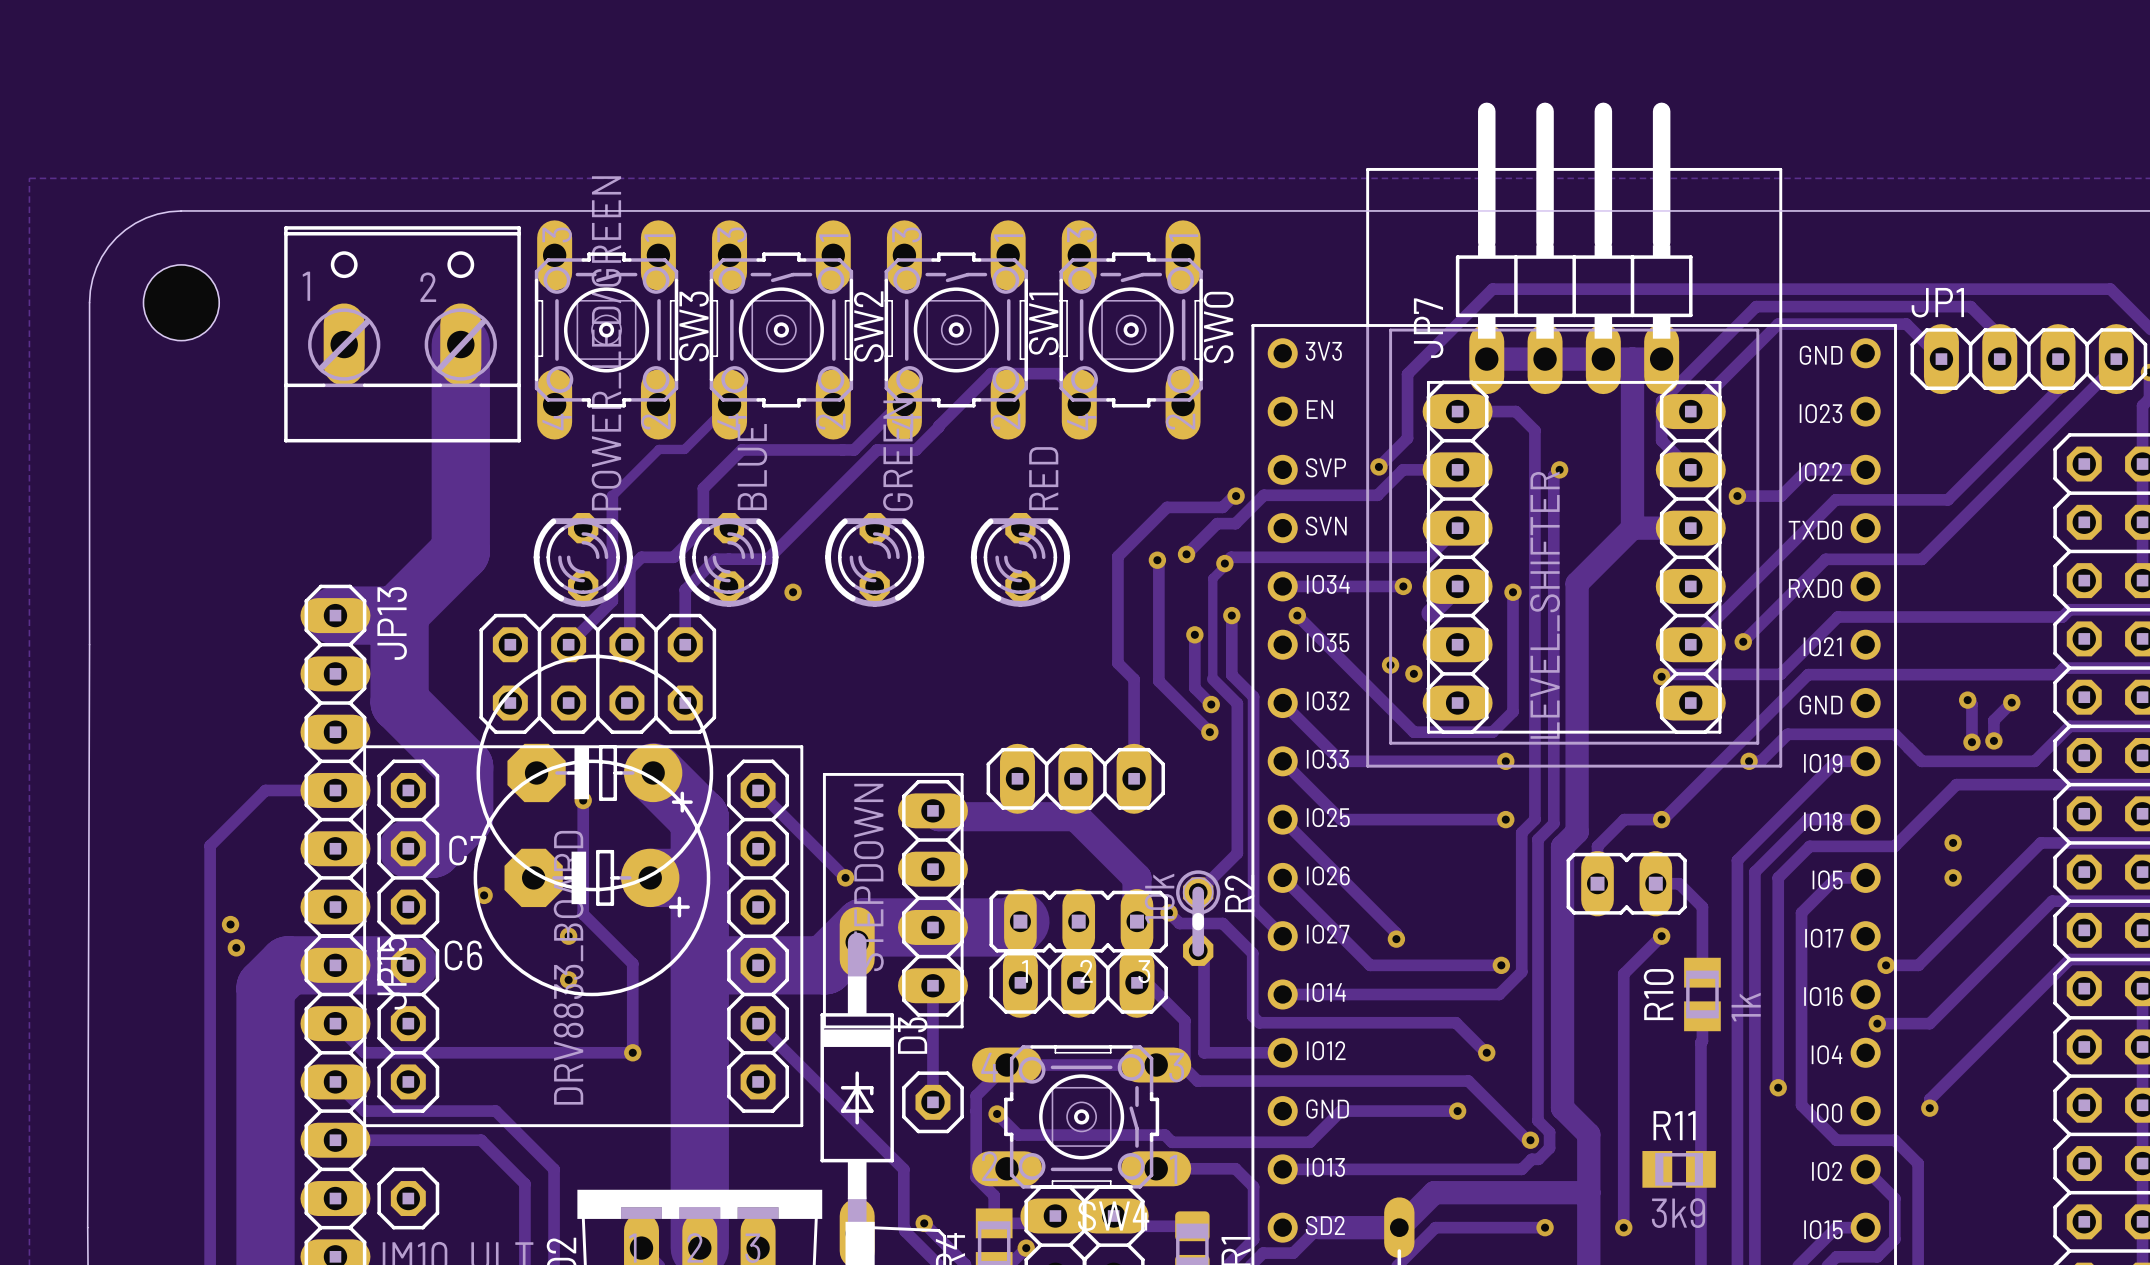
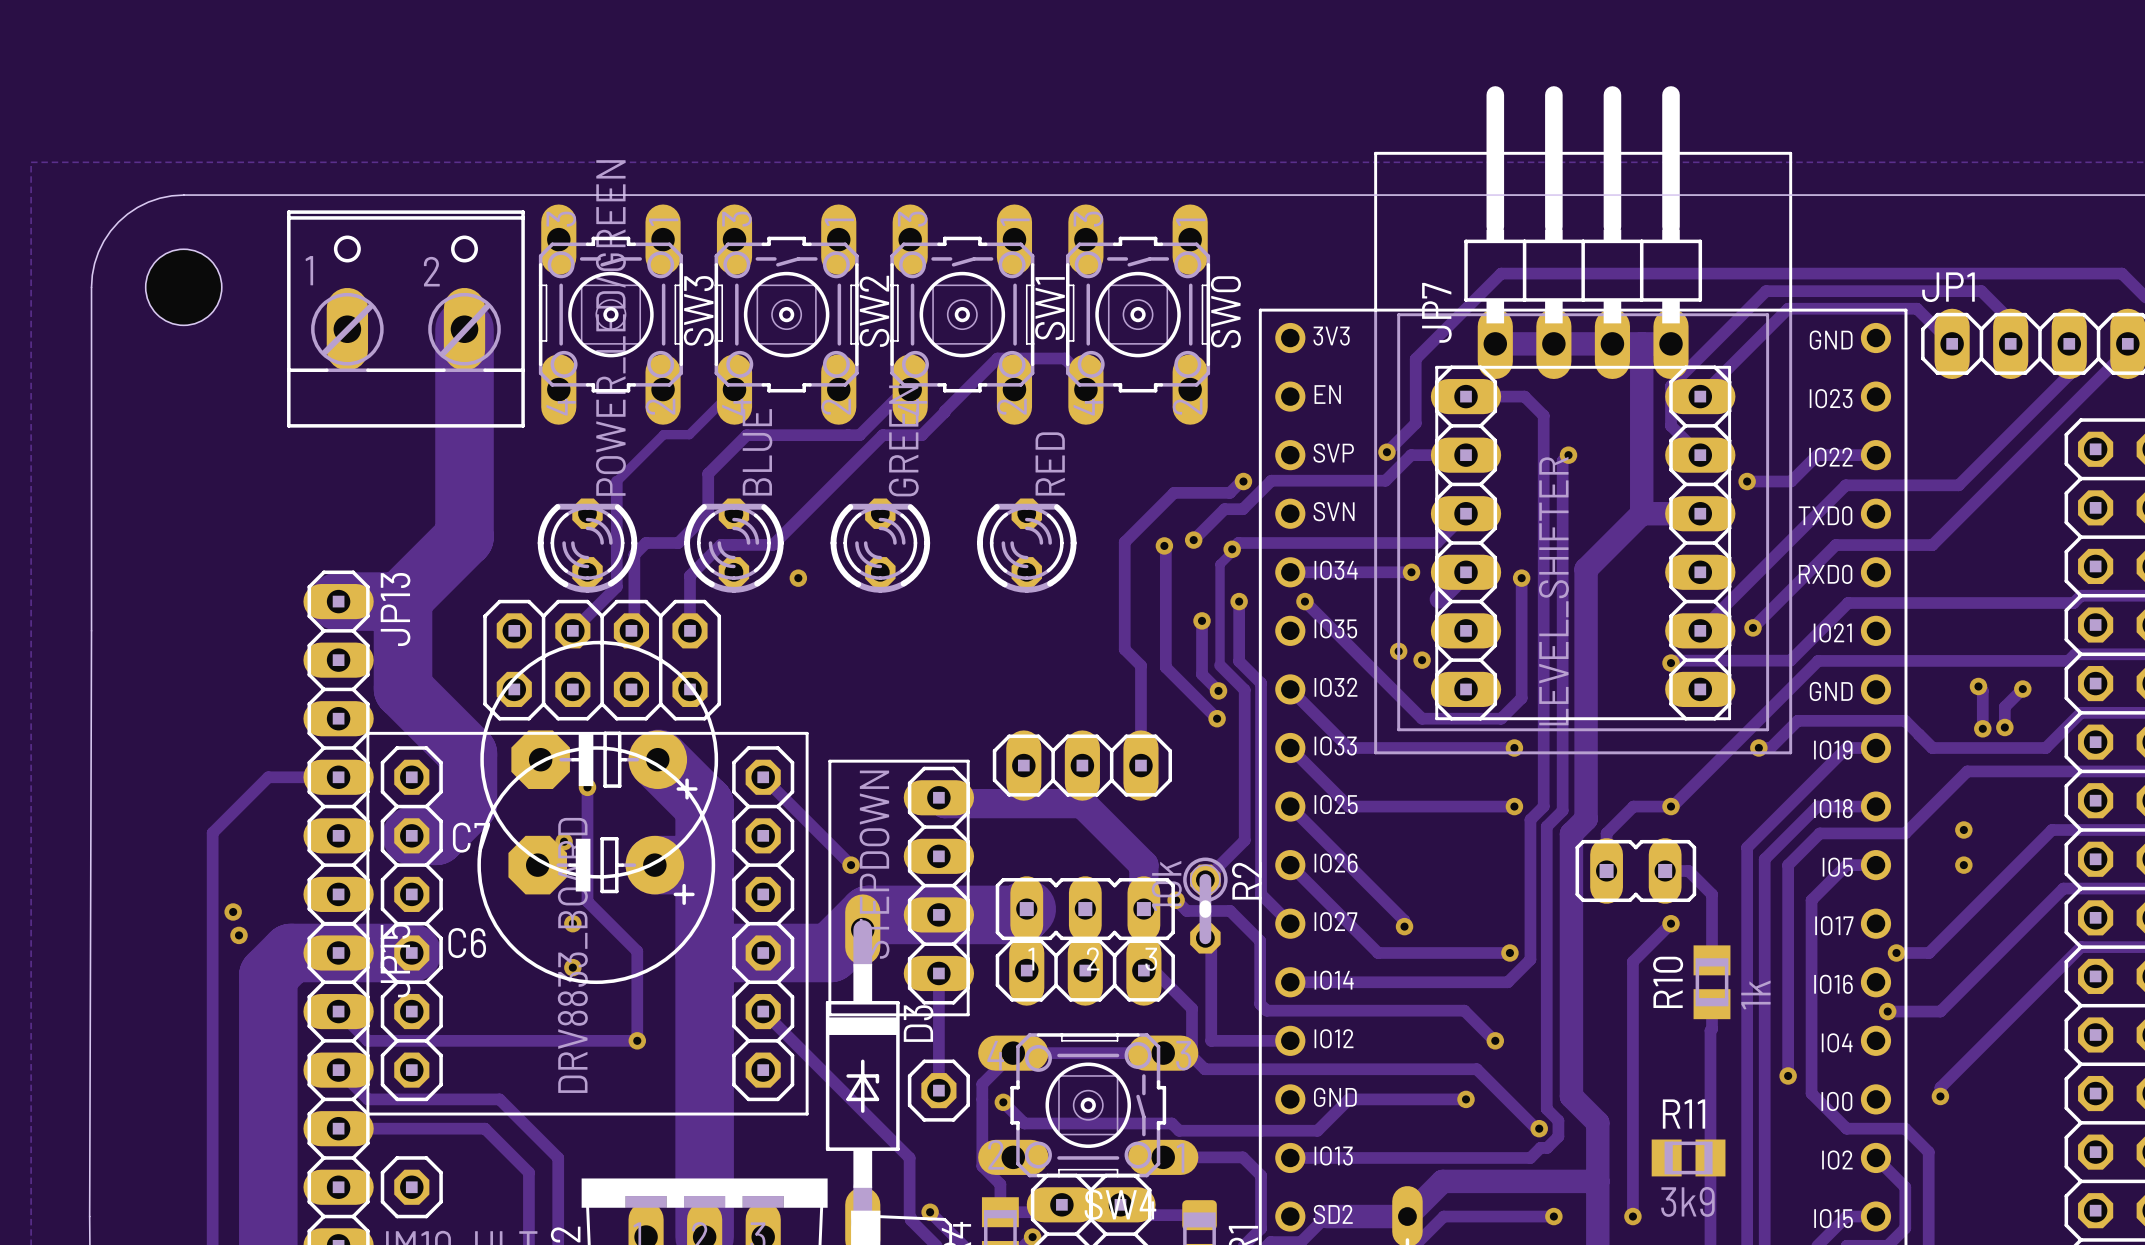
via position: (484, 895) -> (564, 841)

